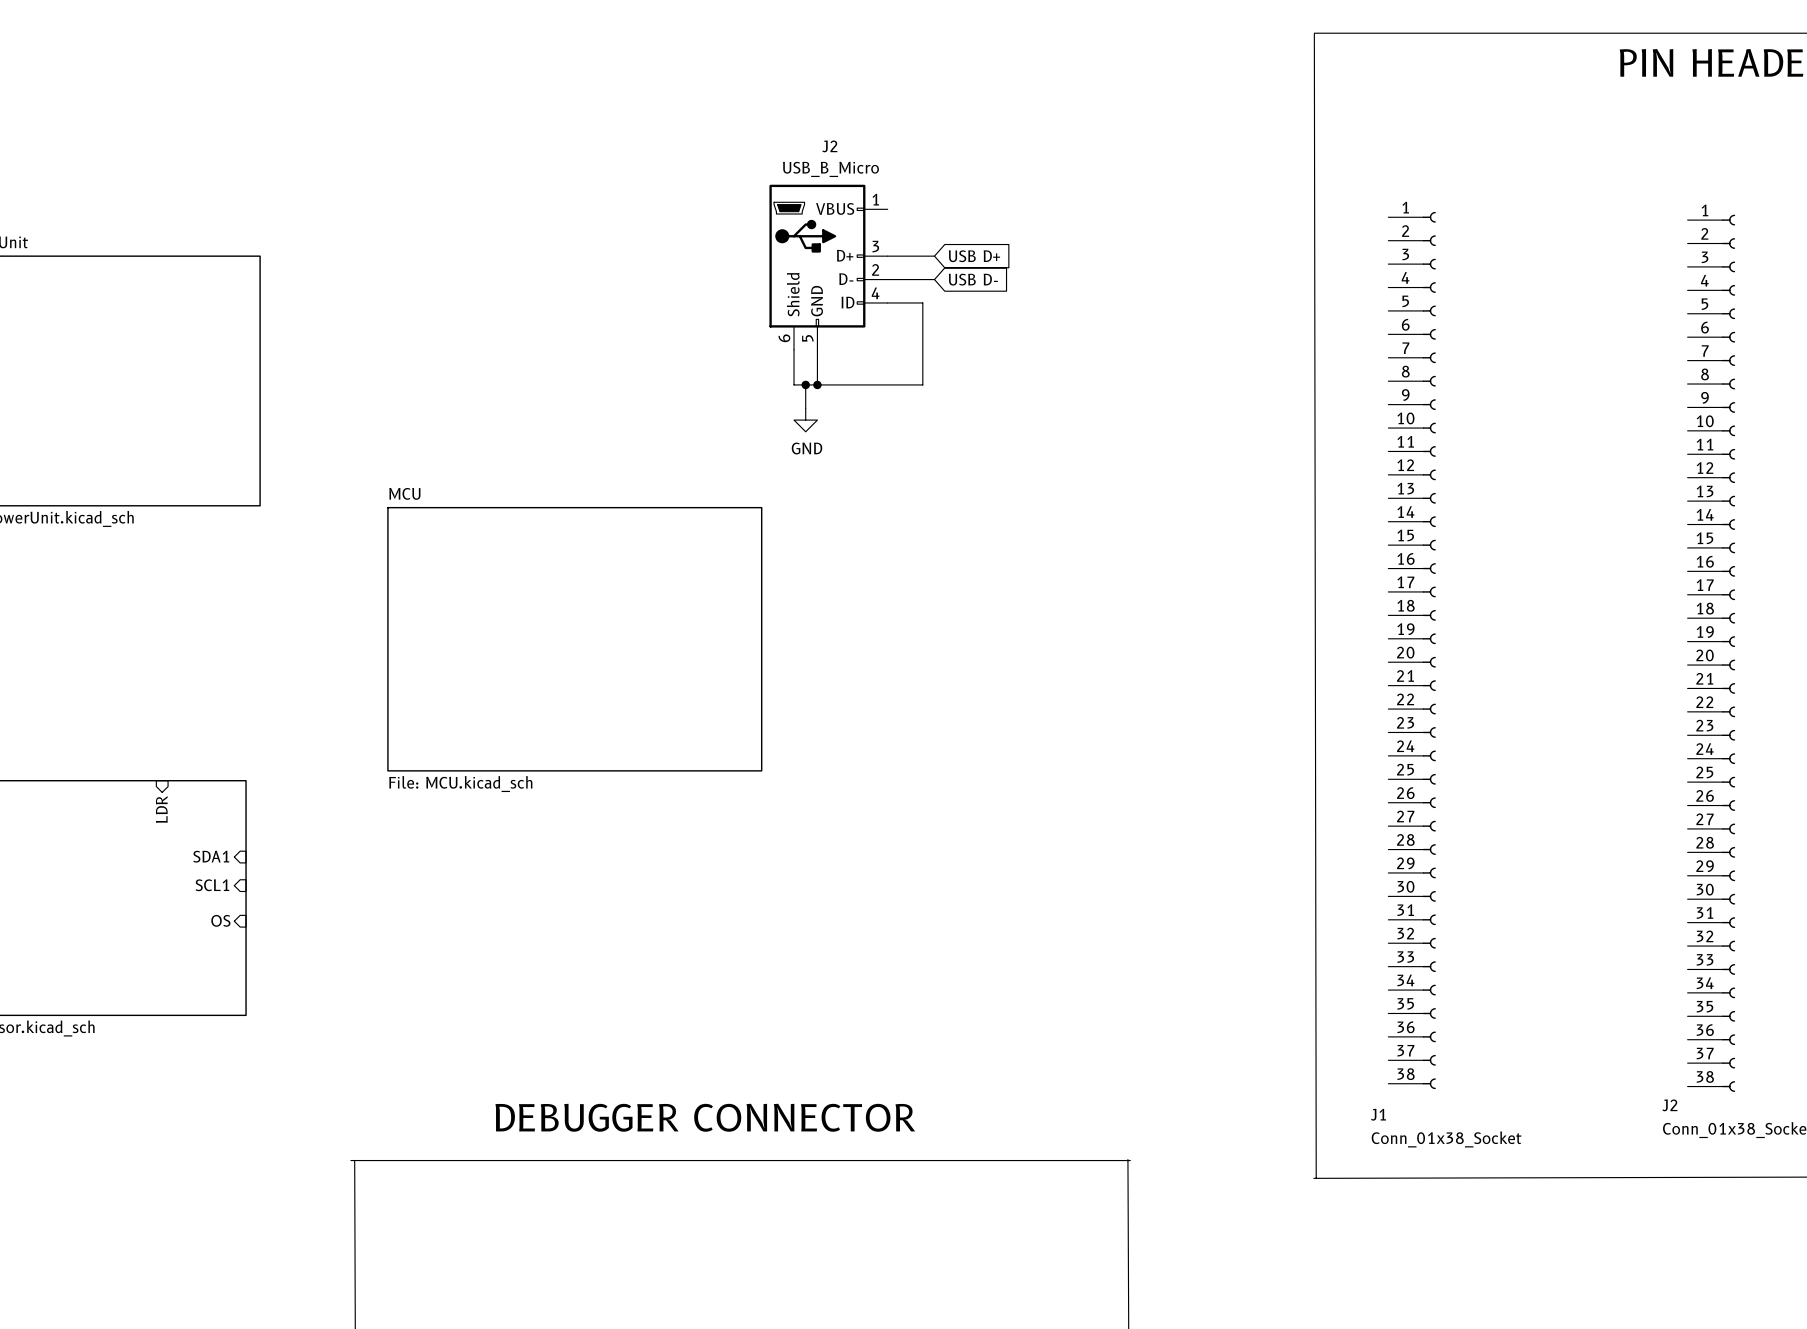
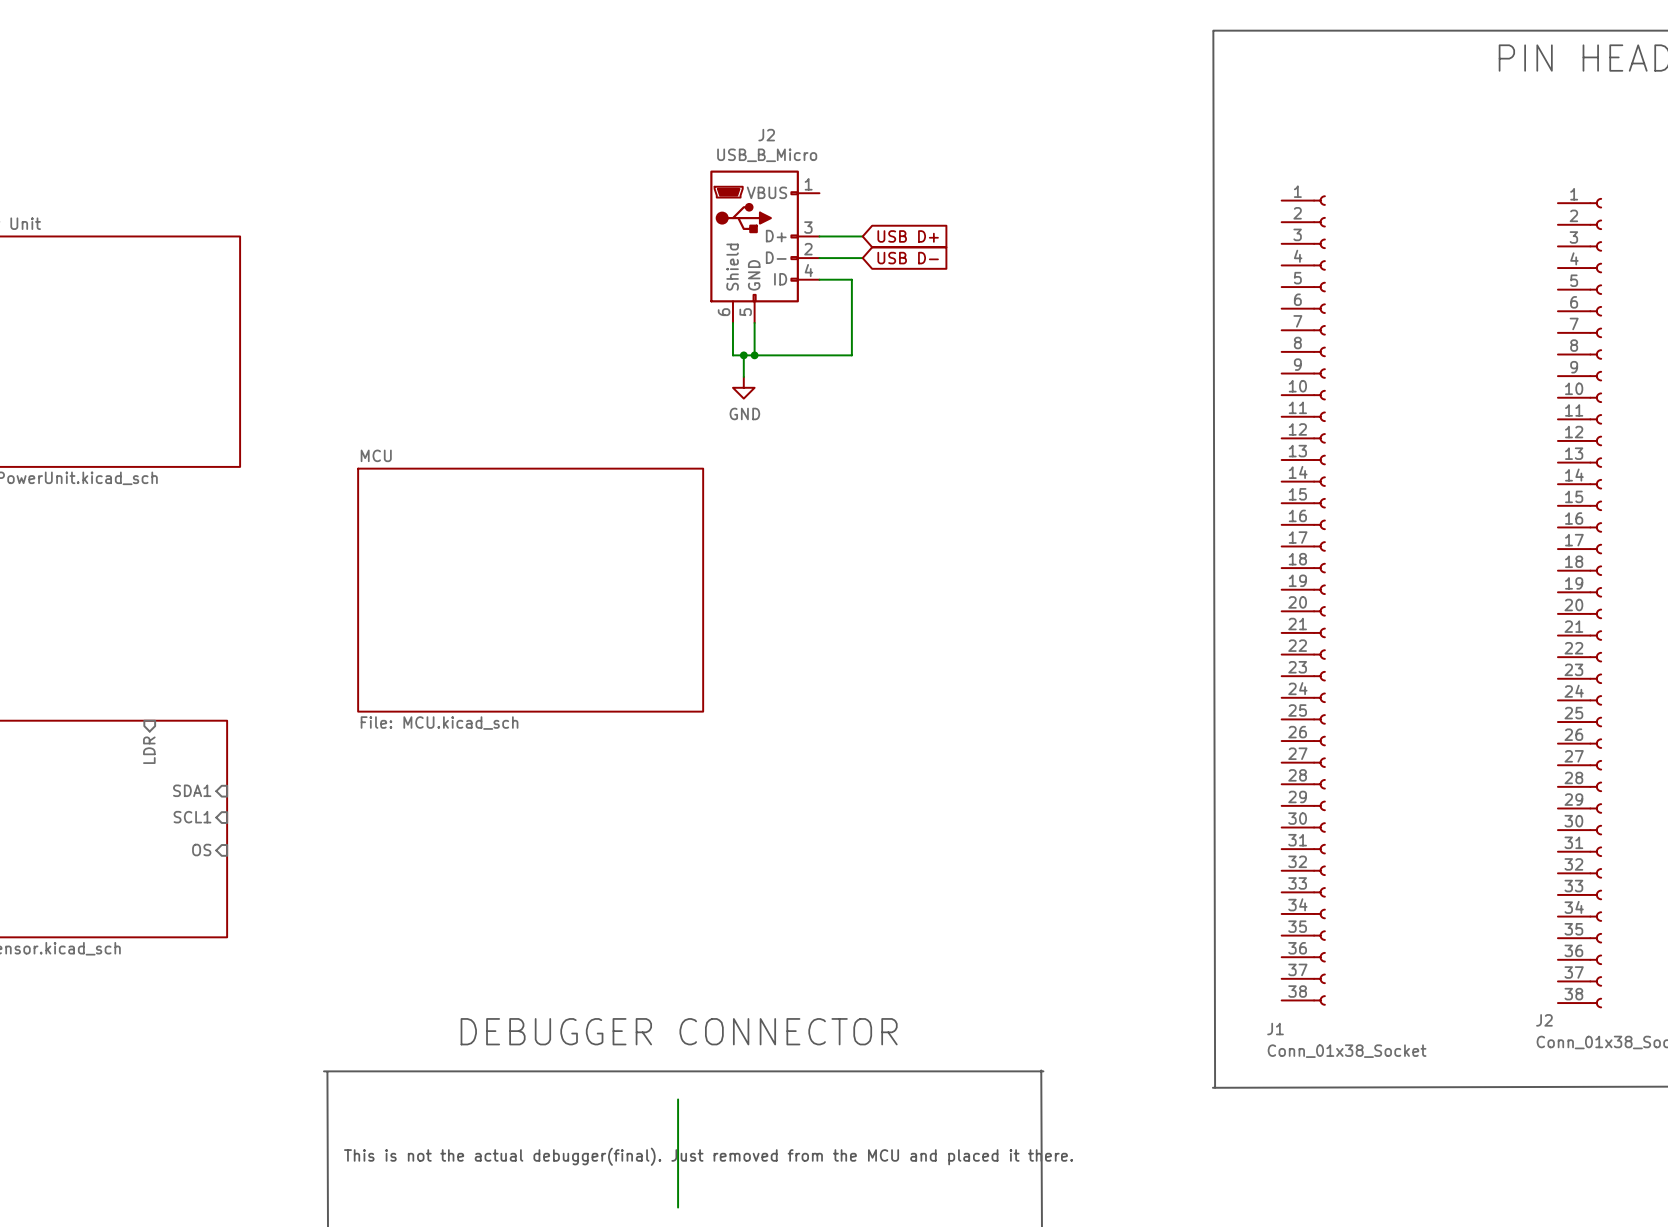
wire: none -> (678, 1099) (678, 1207)
text: none -> This is not the actual debugger(final). Just removed from the MCU and placed it there. (708, 1156)

